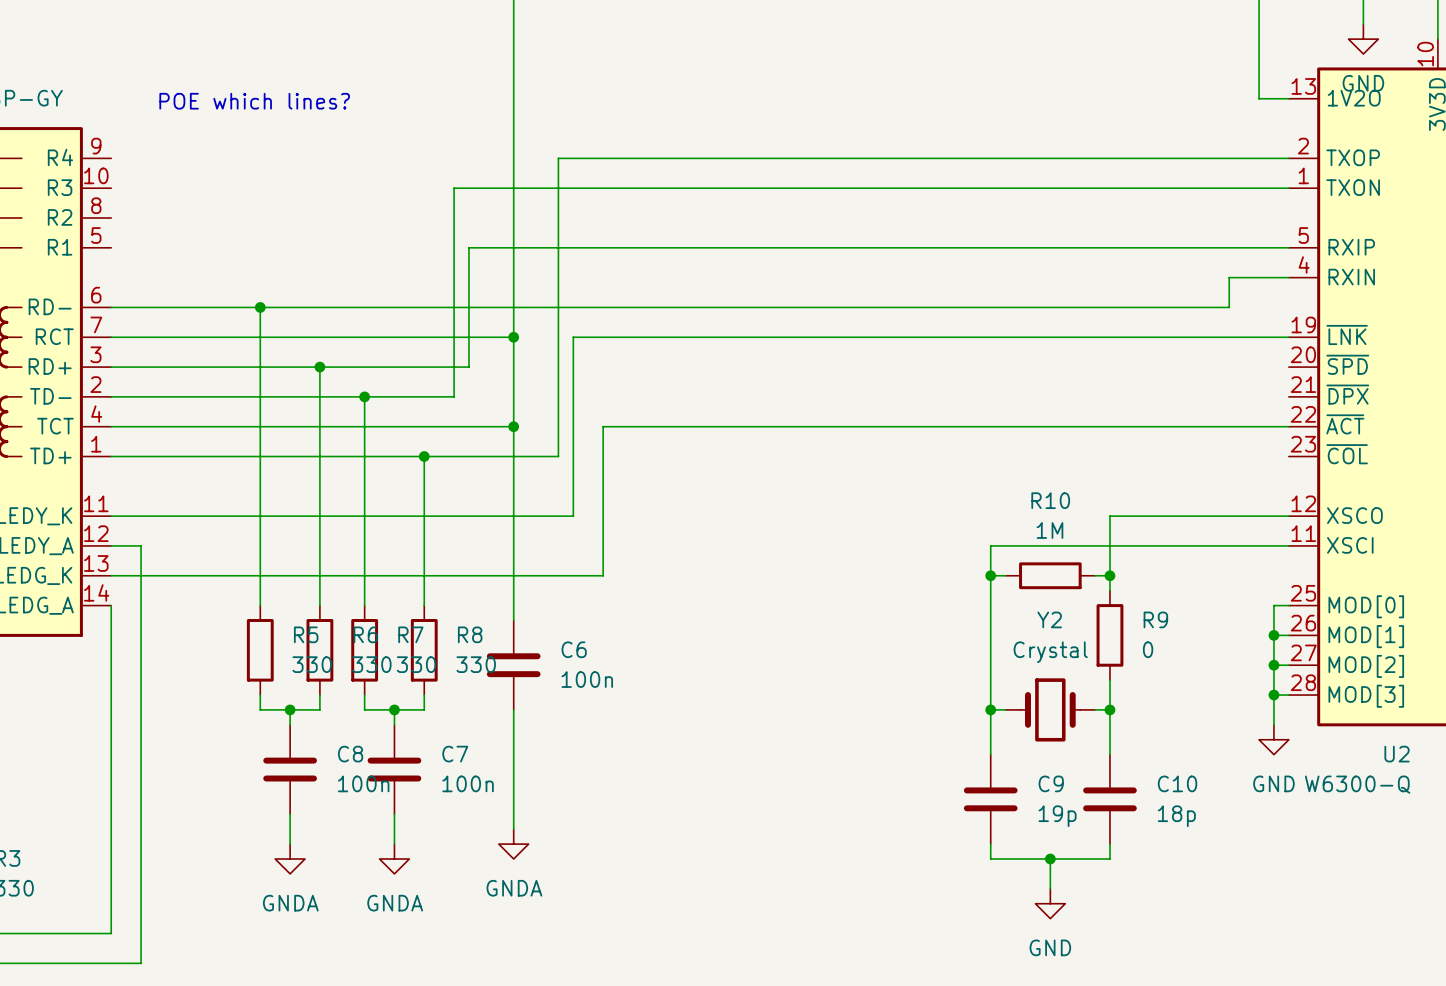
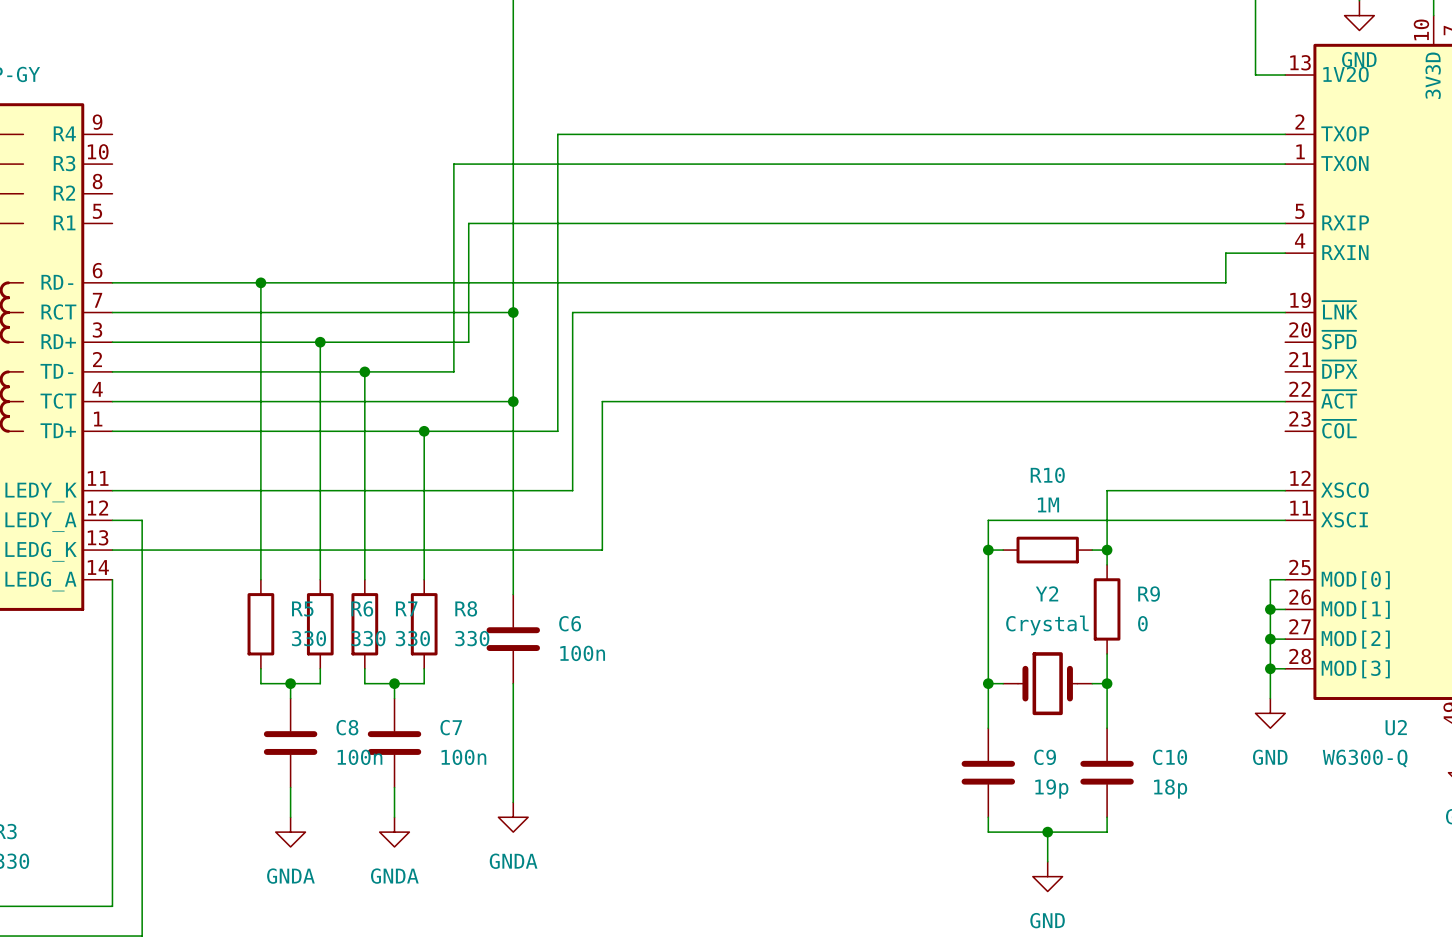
text: POE which lines? (254, 101) -> none

